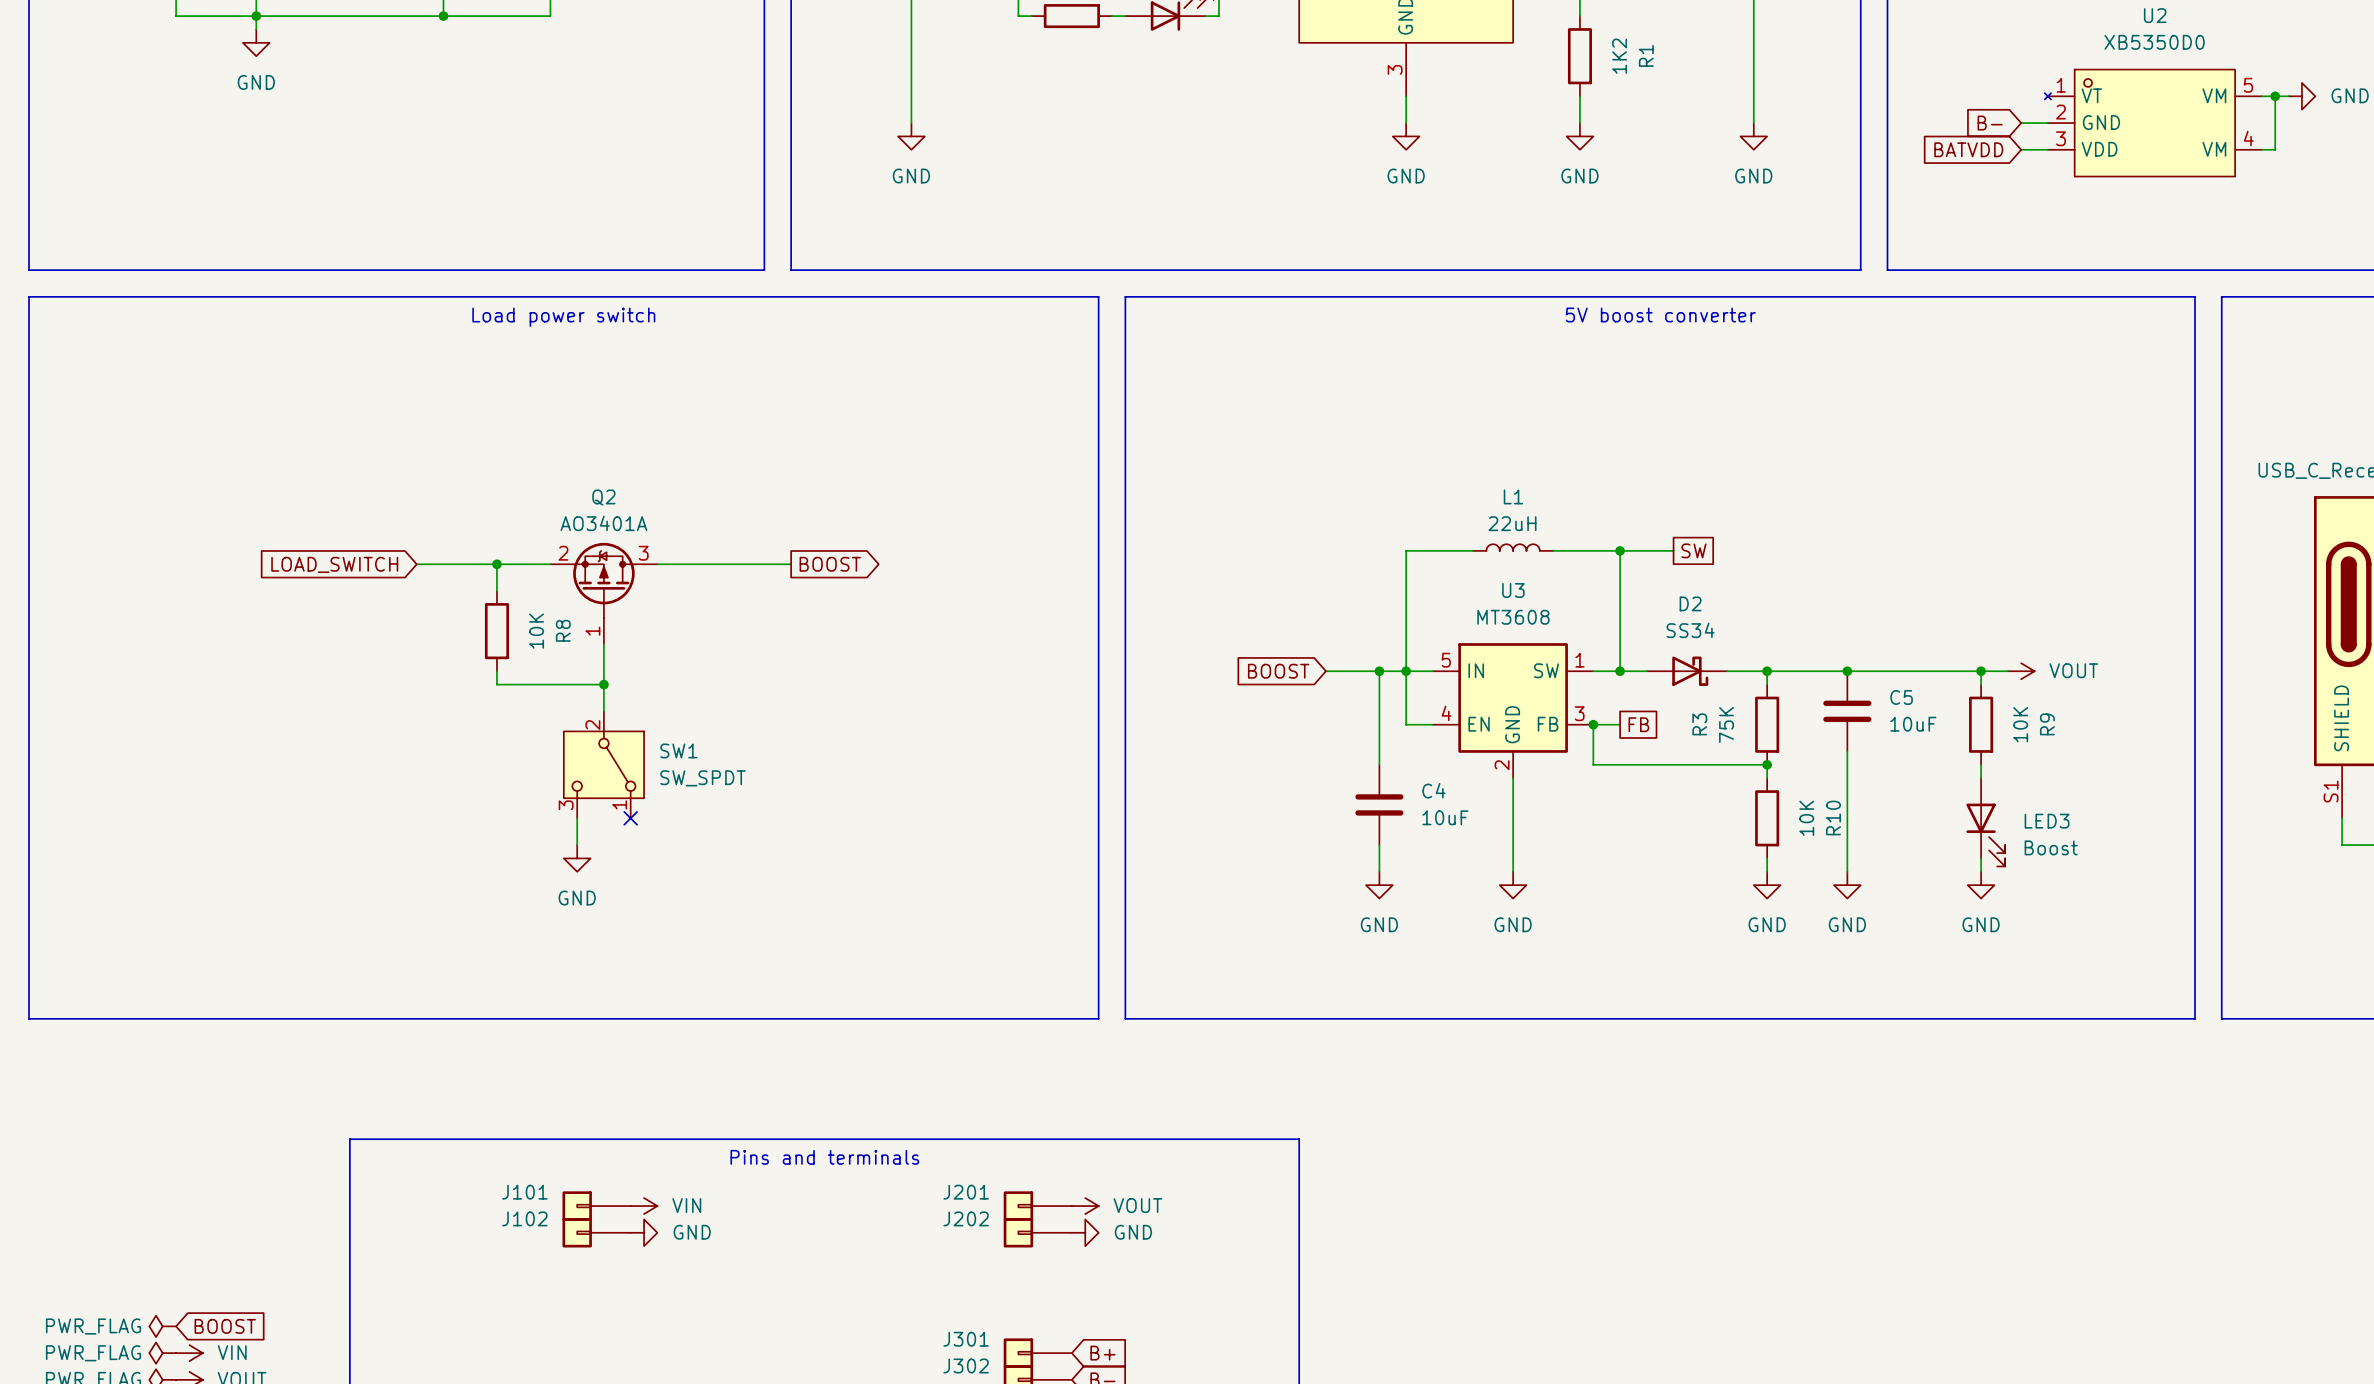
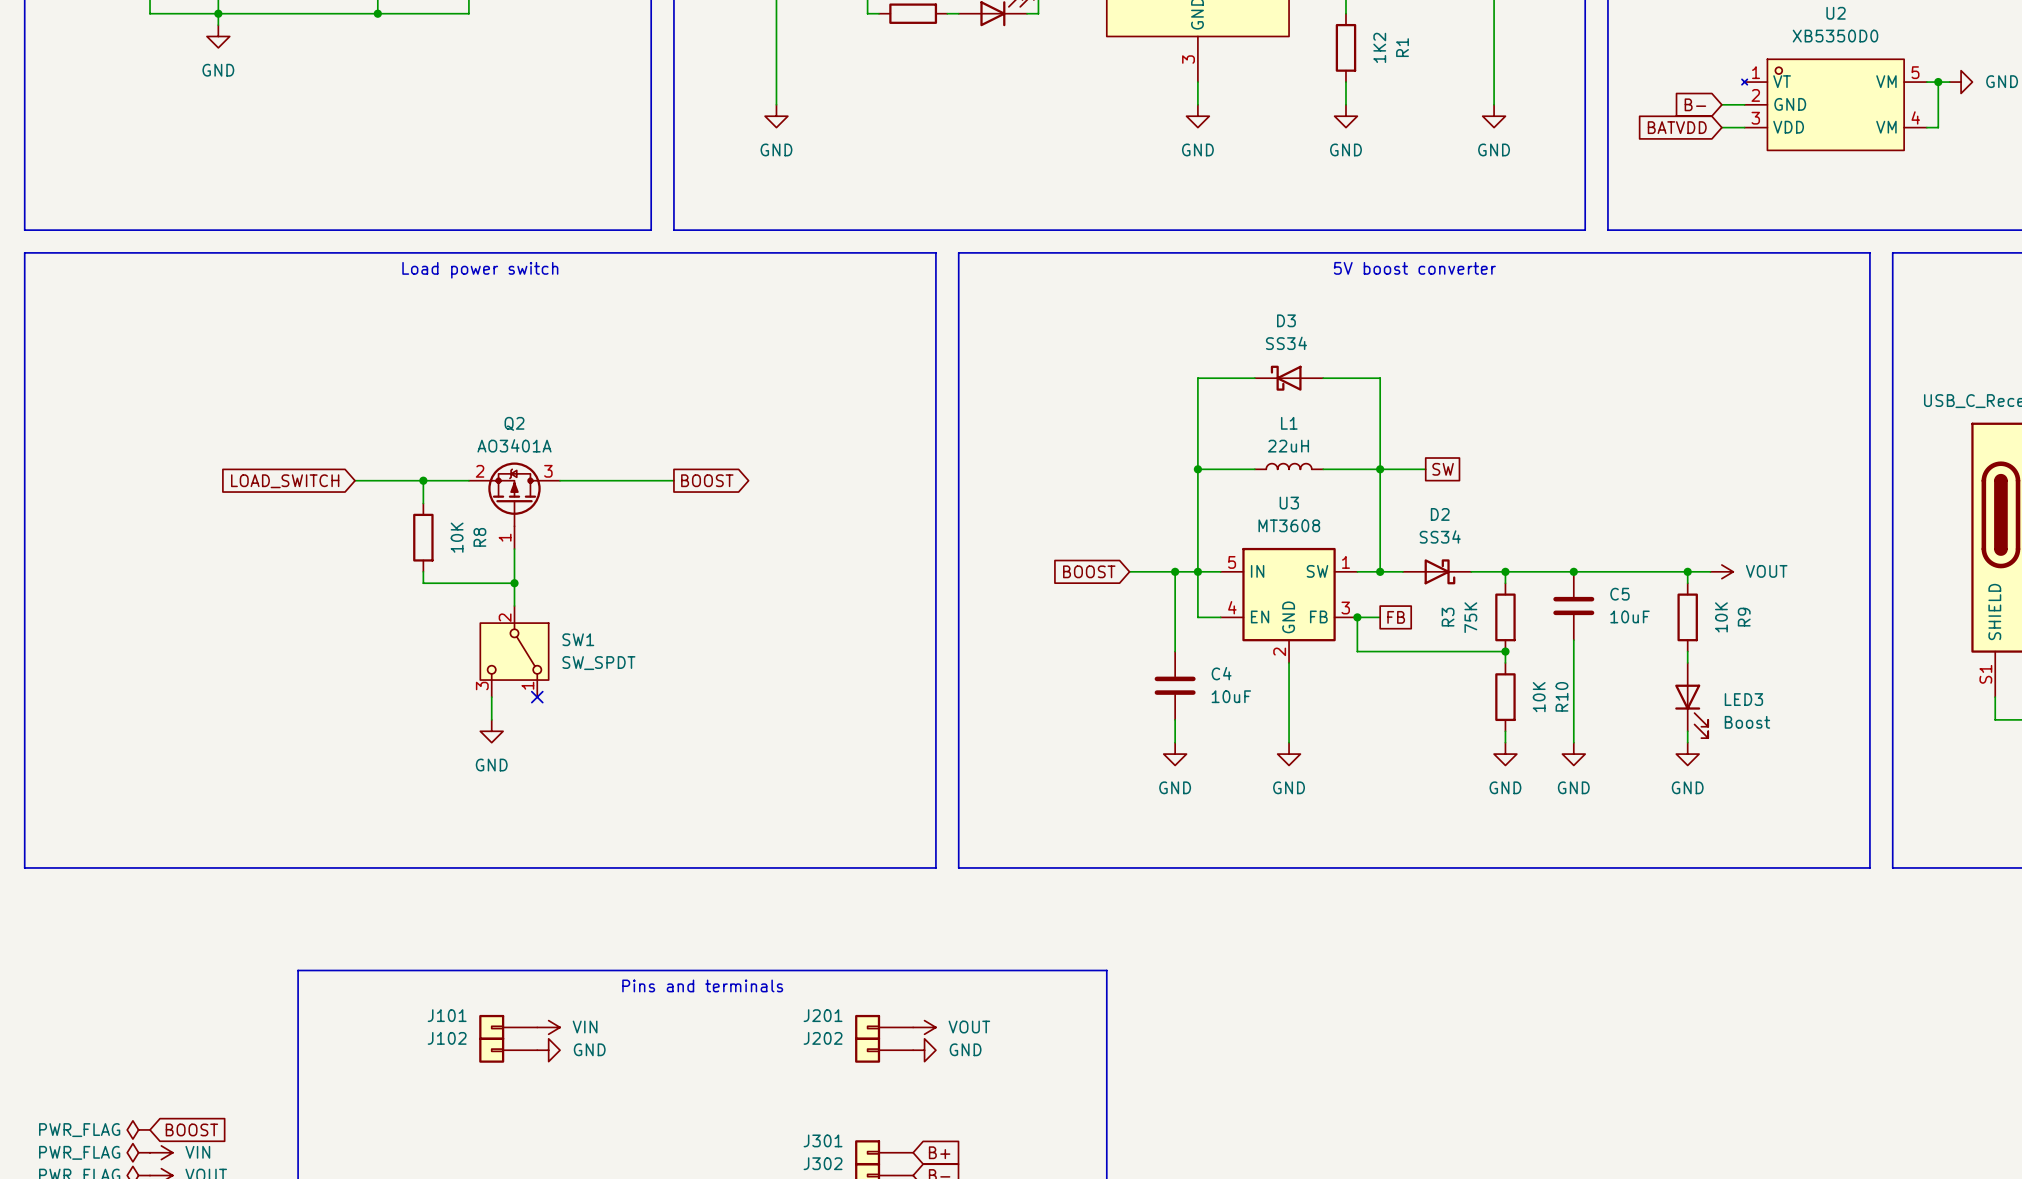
wire: none -> (1254, 378) (1197, 378) (1197, 469)
D3: none -> SS34 (1289, 378)
wire: none -> (1323, 378) (1380, 378) (1380, 469)
junction: none -> (1197, 469)

